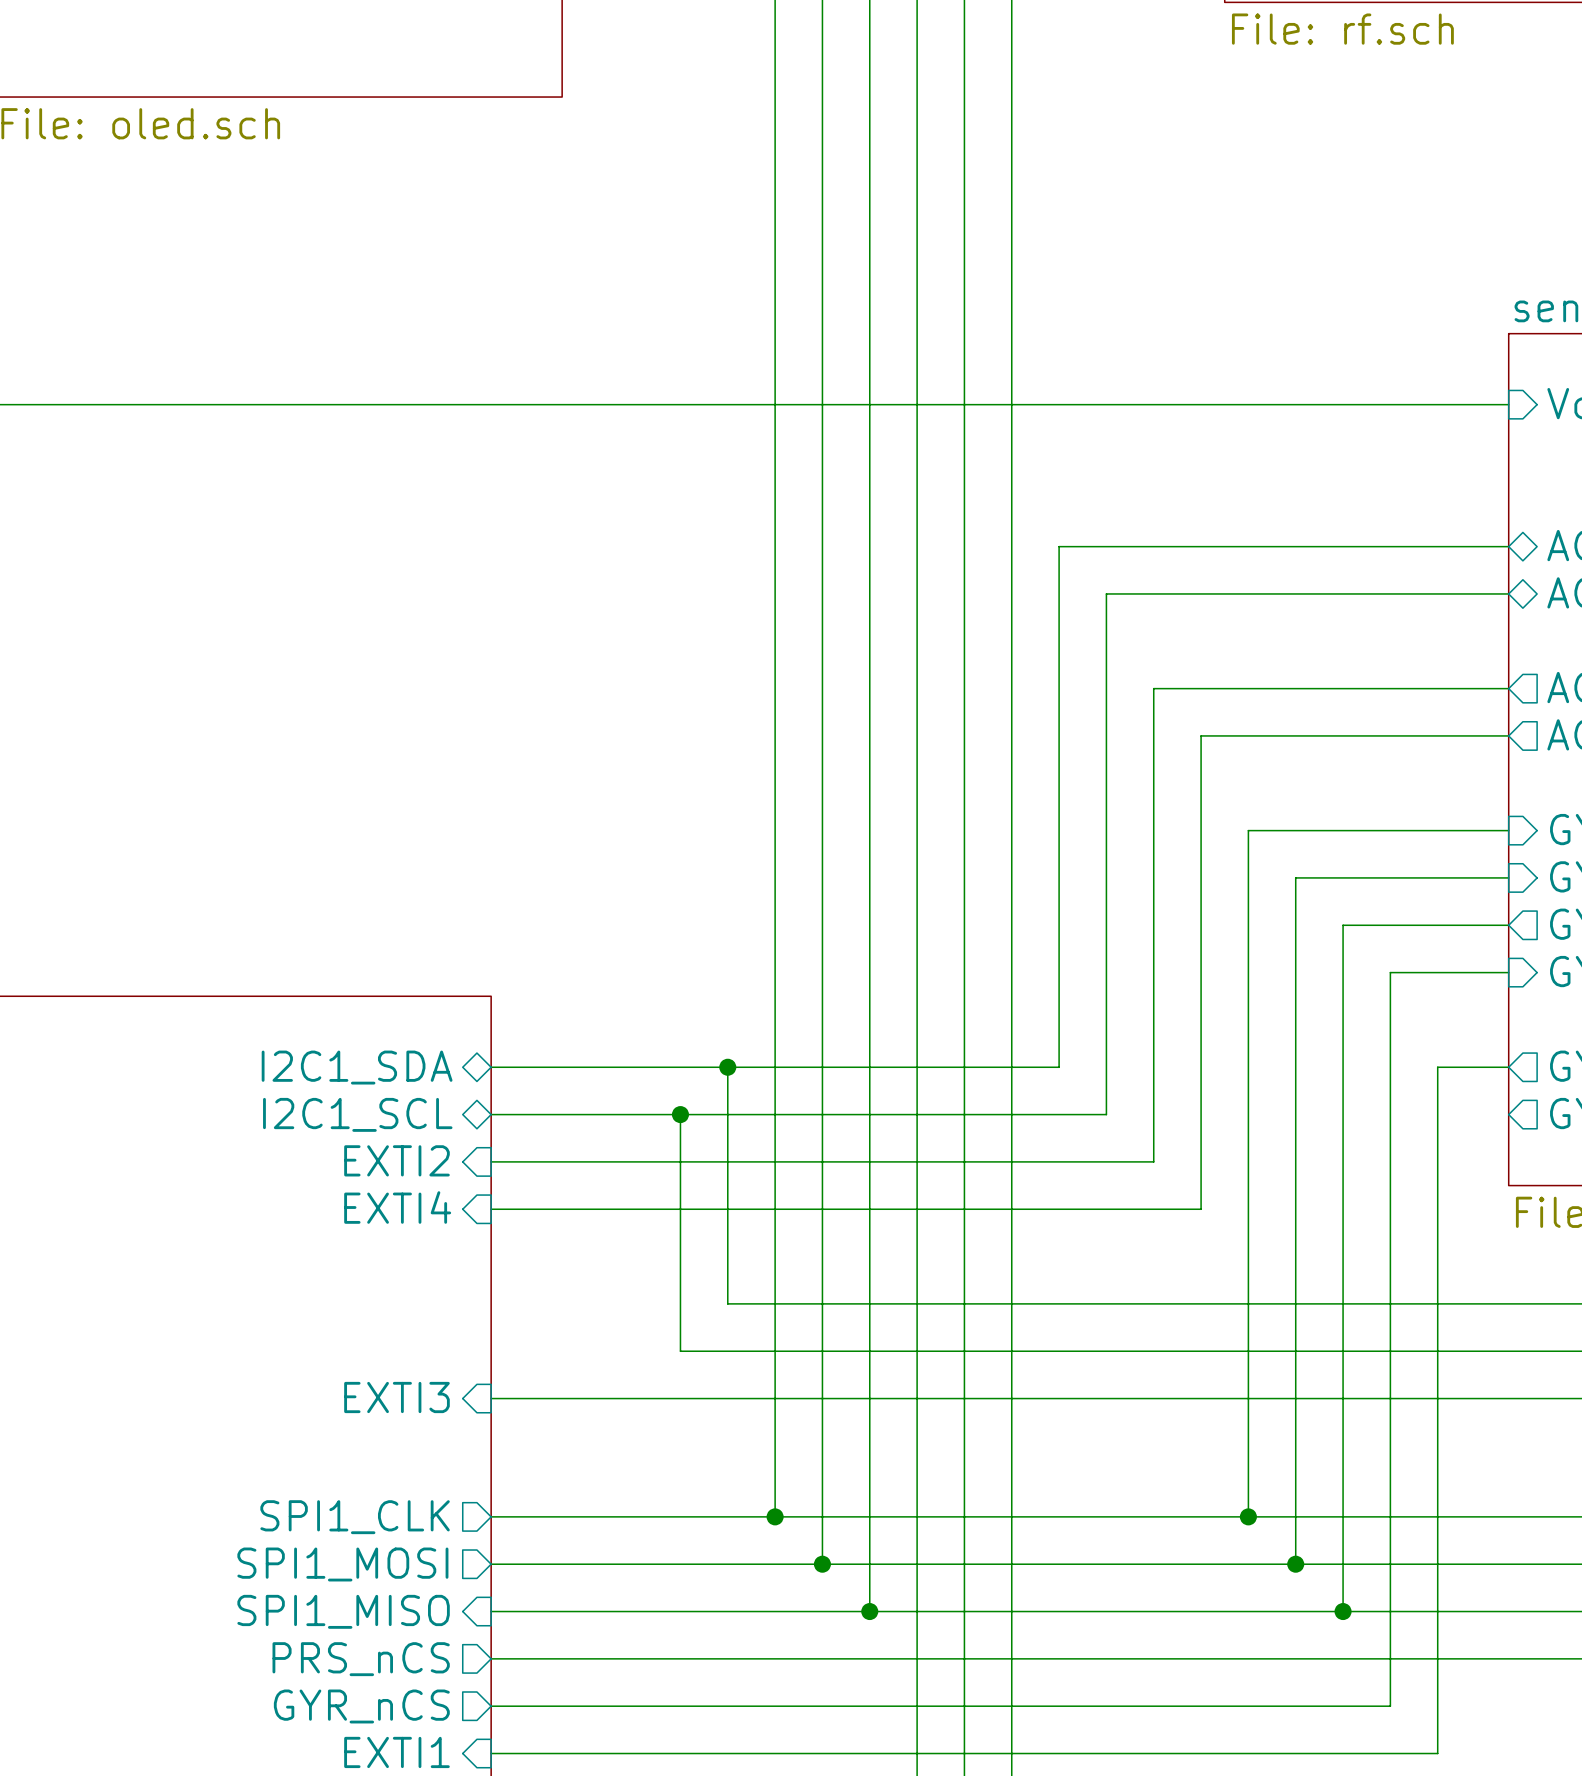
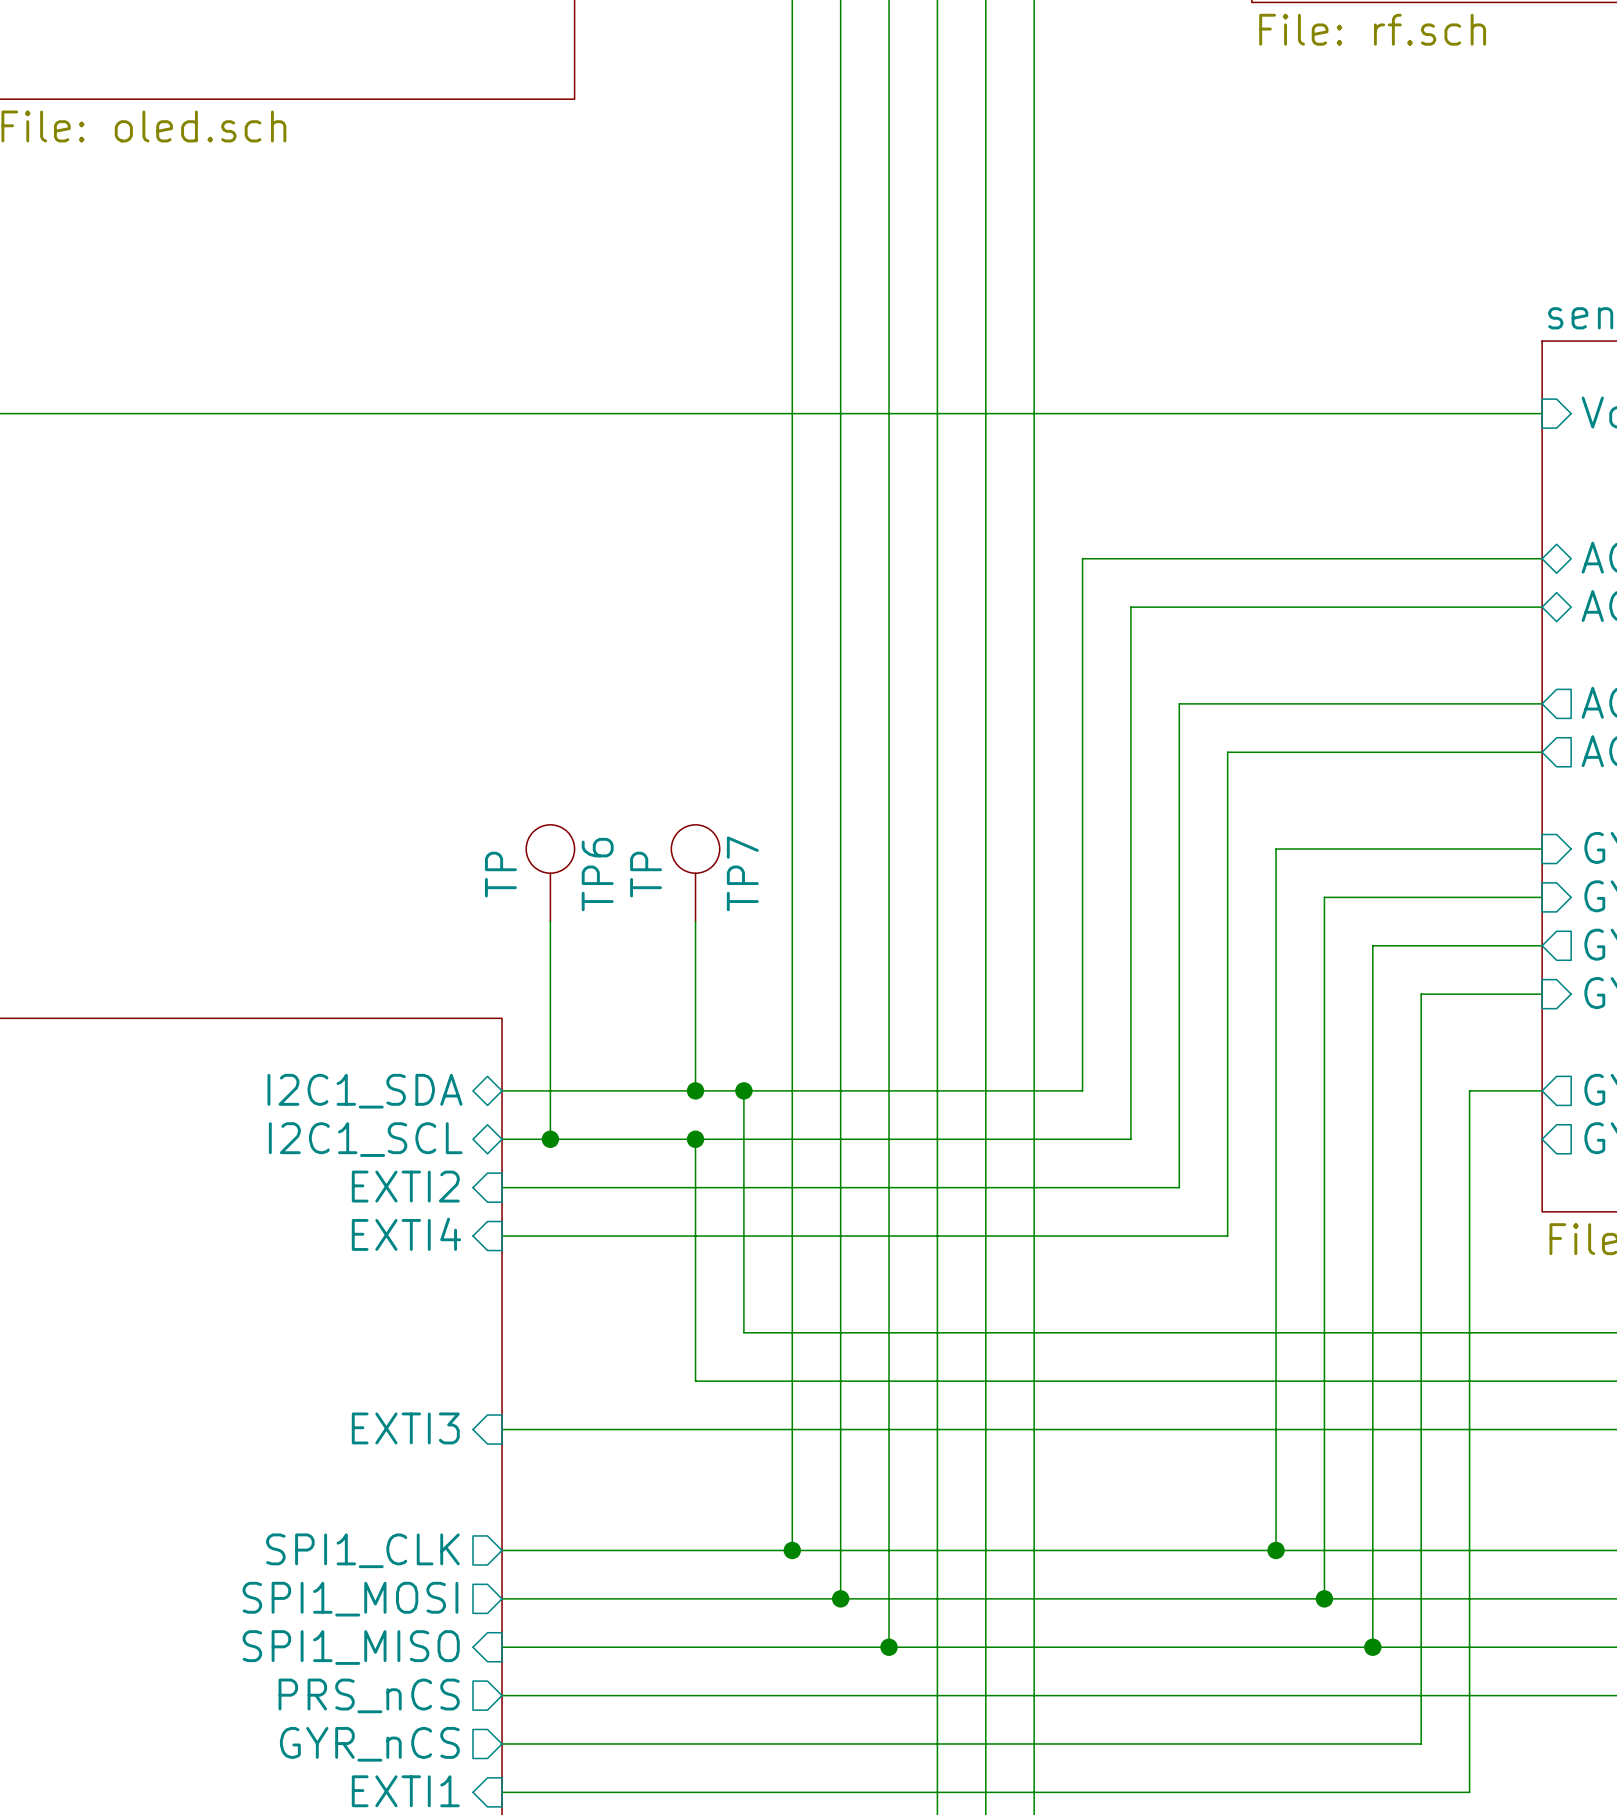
TP6: none -> TP (550, 873)
TP7: none -> TP (695, 873)
wire: none -> (550, 921) (550, 1139)
wire: none -> (695, 921) (695, 1090)
junction: none -> (695, 1090)
junction: none -> (550, 1139)

